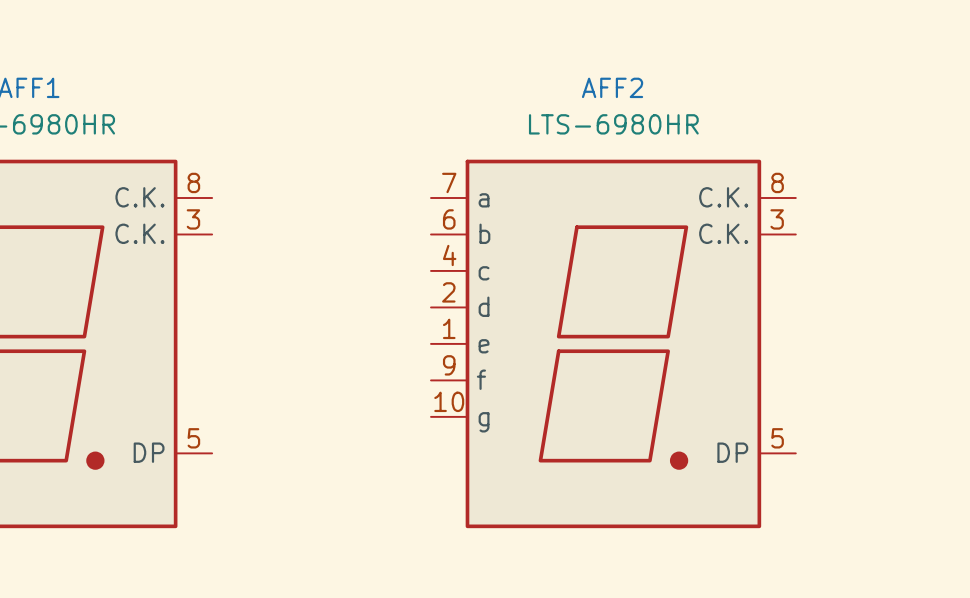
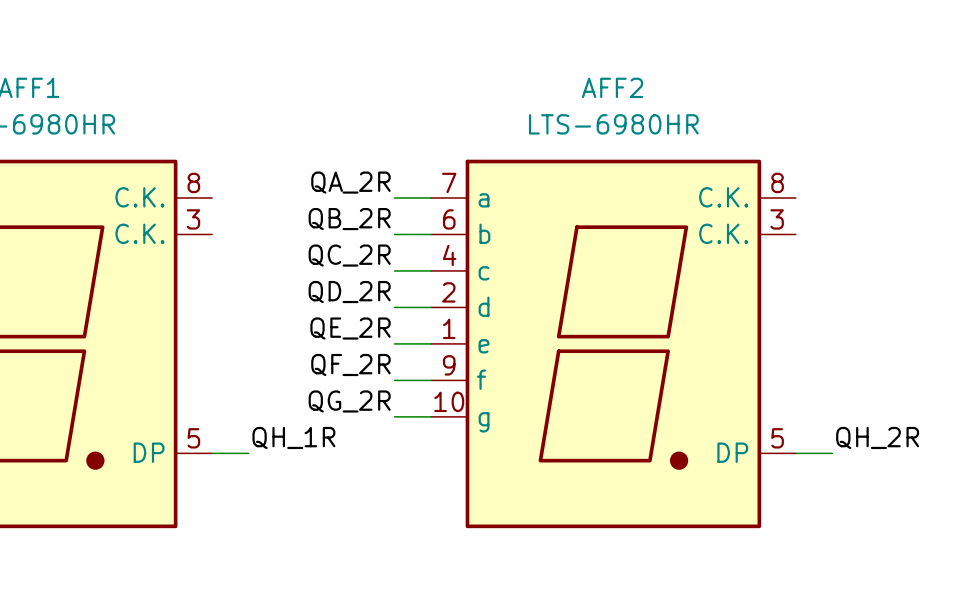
label: none -> QA_2R (350, 182)
wire: none -> (394, 198) (431, 198)
label: none -> QB_2R (349, 219)
wire: none -> (394, 234) (431, 234)
label: none -> QC_2R (349, 255)
wire: none -> (394, 270) (431, 270)
label: none -> QD_2R (349, 292)
wire: none -> (394, 307) (431, 307)
label: none -> QE_2R (350, 328)
wire: none -> (394, 343) (431, 343)
label: none -> QF_2R (350, 365)
wire: none -> (394, 380) (431, 380)
label: none -> QG_2R (349, 401)
wire: none -> (394, 416) (431, 416)
label: none -> QH_1R (293, 437)
label: none -> QH_2R (877, 437)
wire: none -> (212, 453) (248, 453)
wire: none -> (795, 453) (832, 453)

